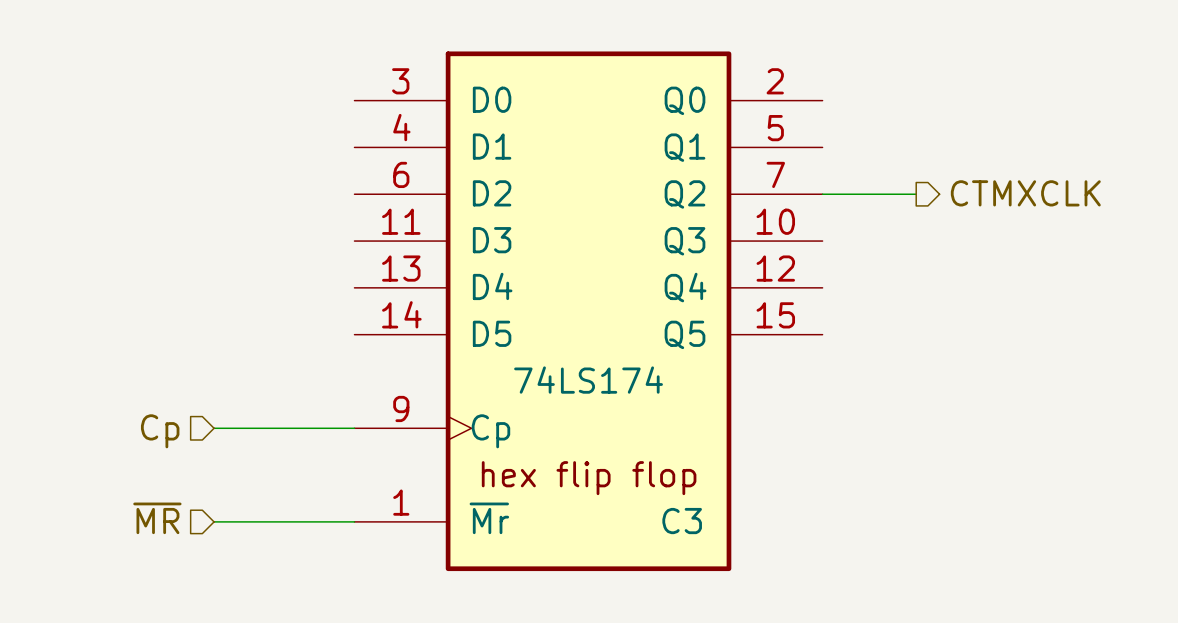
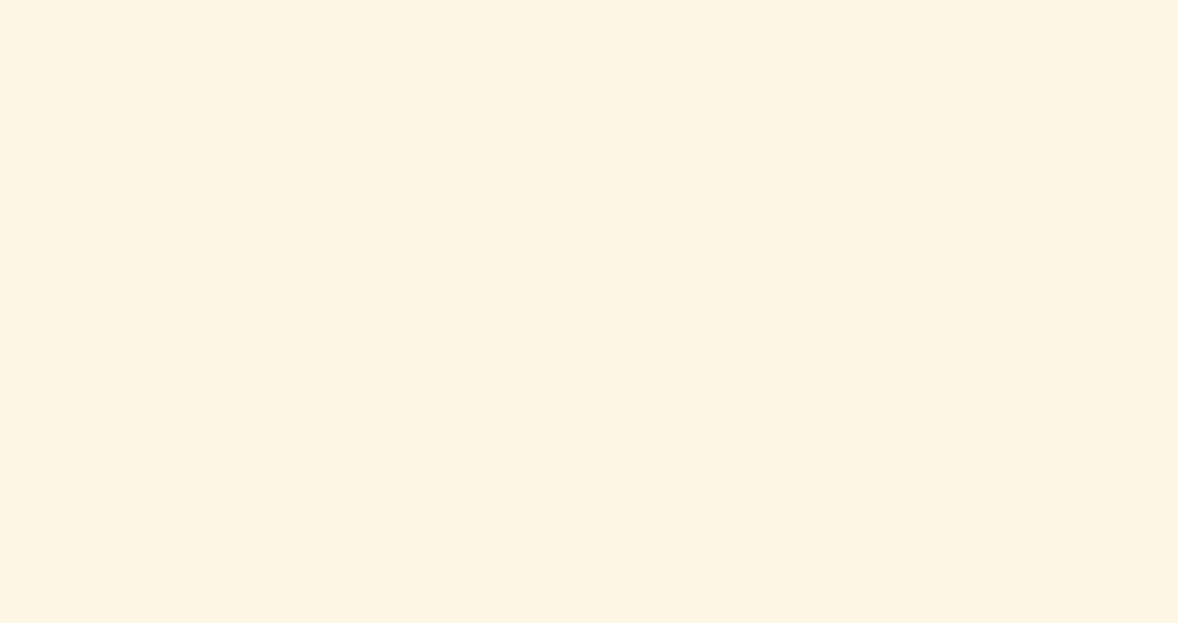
hierarchical label: CTMXCLK (1025, 193) -> none
wire: (822, 194) (916, 194) -> none
C3: 74LS174 (588, 311) -> none
wire: (214, 428) (354, 428) -> none
hierarchical label: Cp (160, 431) -> none
hierarchical label: ~{MR} (157, 518) -> none
wire: (214, 521) (354, 521) -> none

